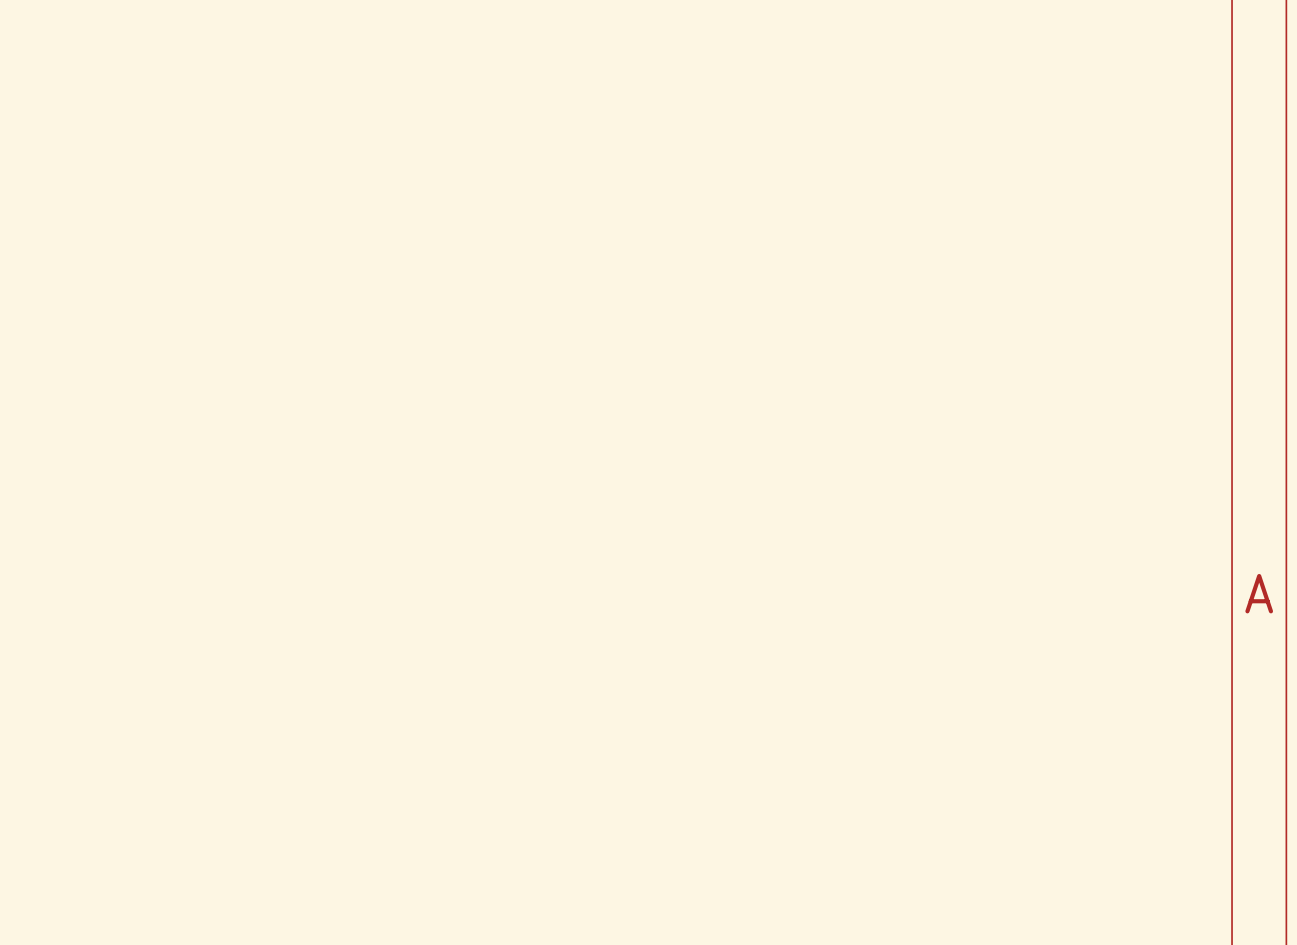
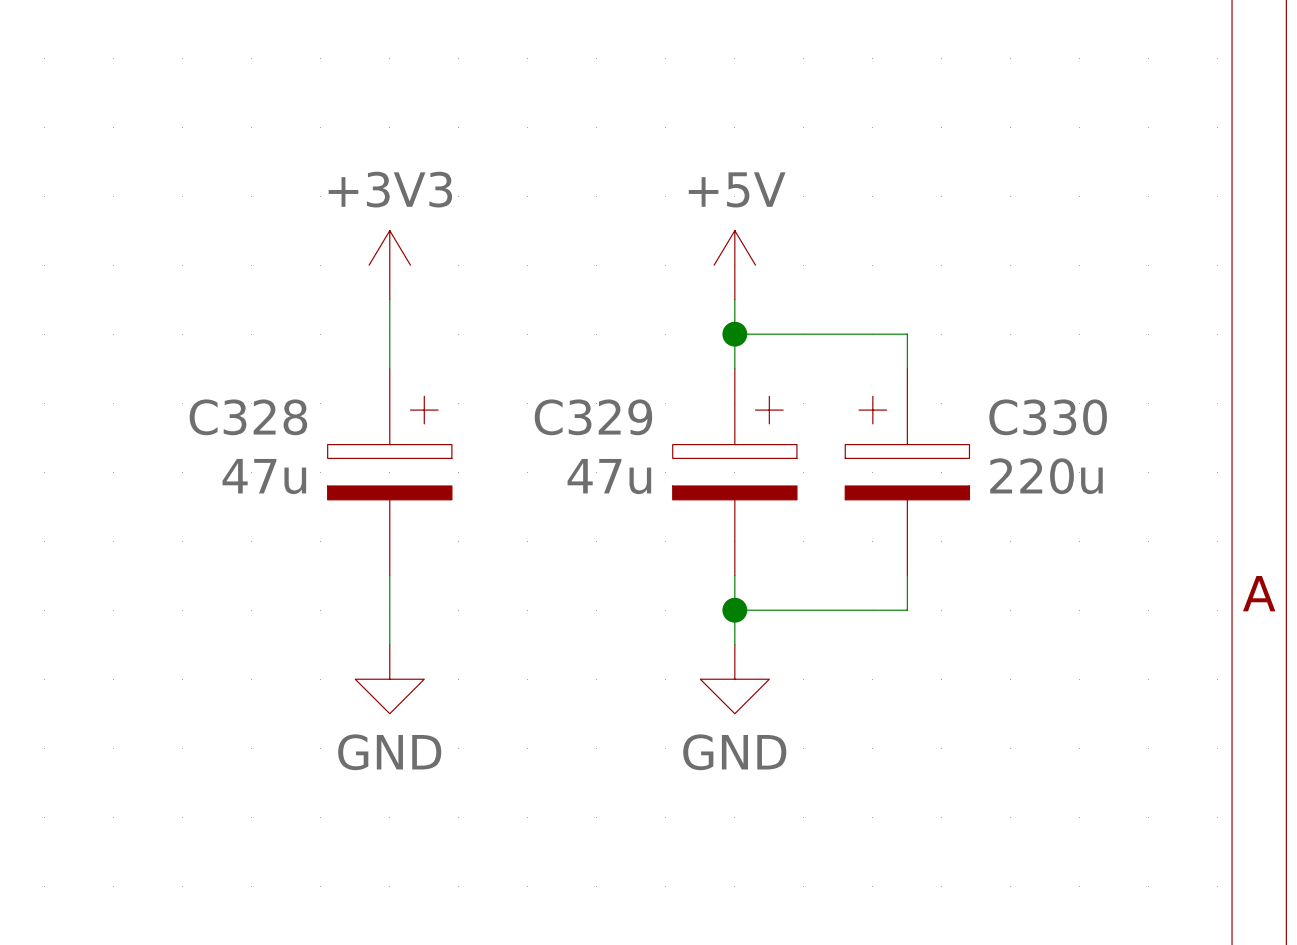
power symbol: none -> +3V3 (389, 265)
power symbol: none -> +5V (734, 265)
wire: none -> (389, 299) (389, 368)
wire: none -> (734, 299) (734, 368)
wire: none -> (734, 334) (907, 334) (907, 368)
junction: none -> (734, 334)
C328: none -> 47u (389, 472)
C329: none -> 47u (734, 472)
C330: none -> 220u (907, 472)
wire: none -> (389, 575) (389, 644)
wire: none -> (734, 575) (734, 644)
wire: none -> (907, 575) (907, 610) (734, 610)
junction: none -> (734, 610)
power symbol: none -> GND (389, 679)
power symbol: none -> GND (734, 679)

